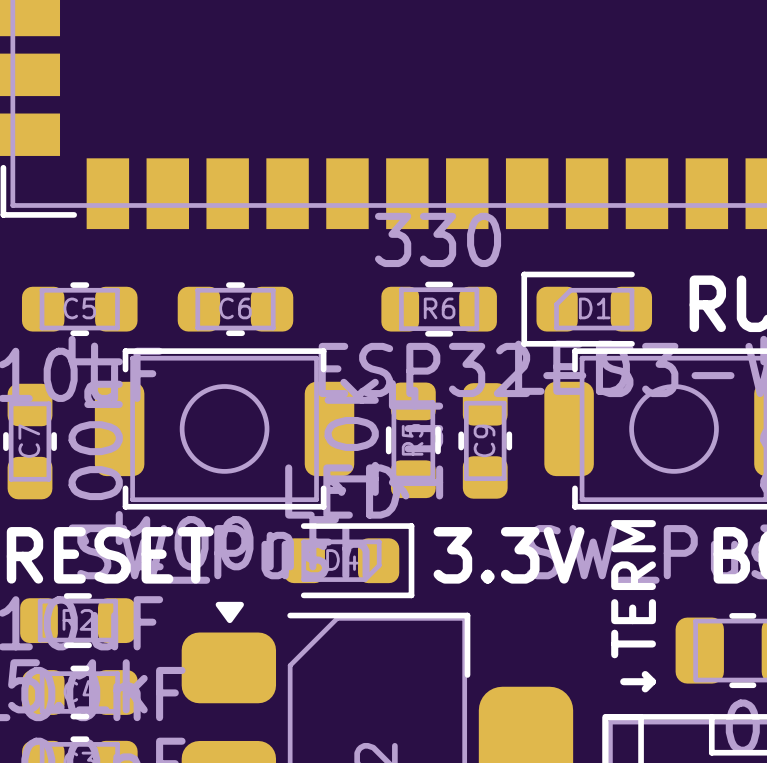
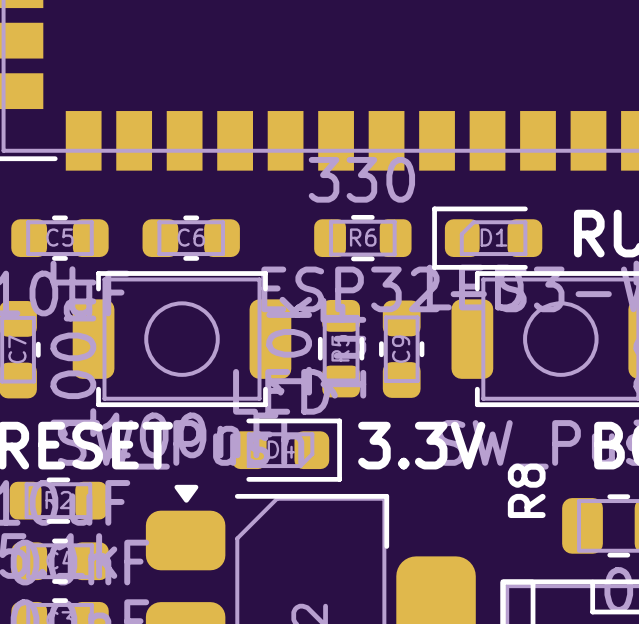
↓TERM name: ↓TERM (633, 606) -> R8 (526, 490)

